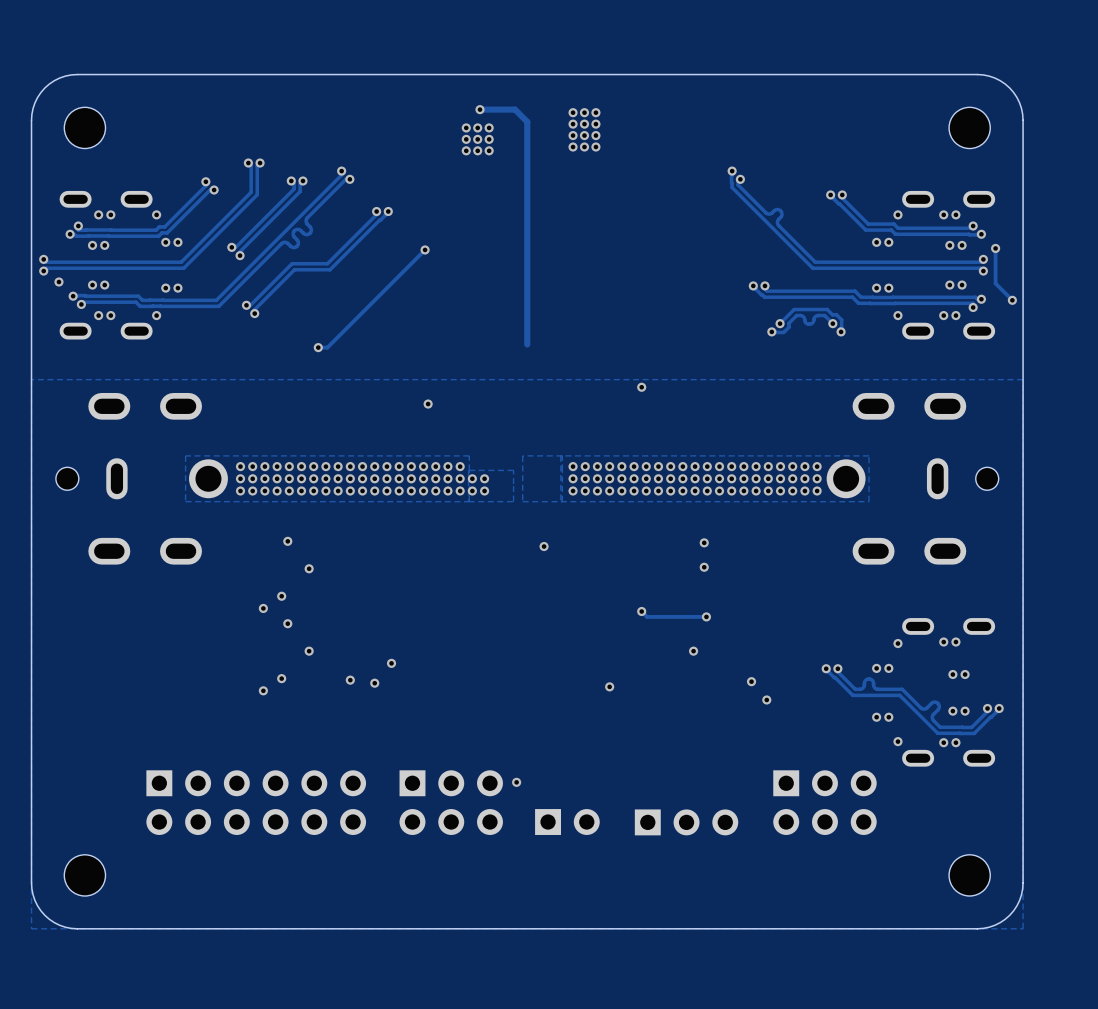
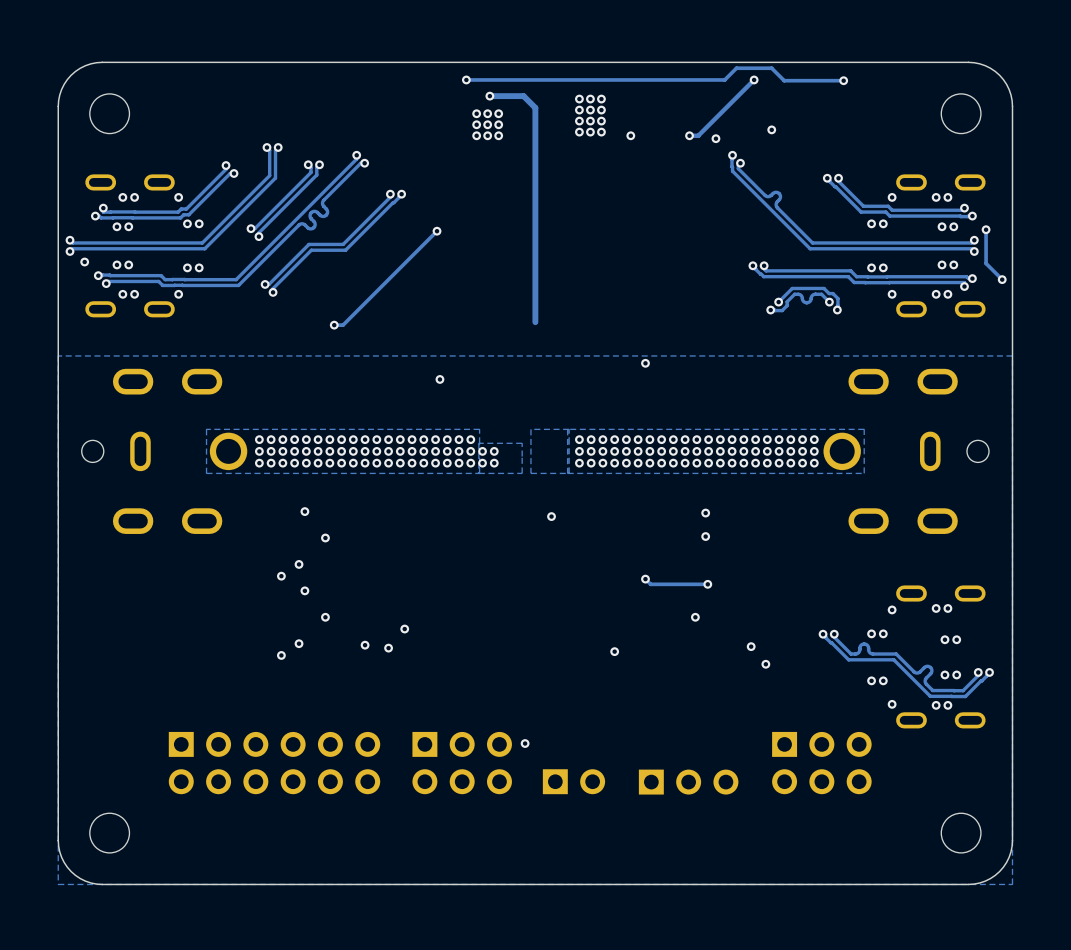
track: none -> (466, 79) (724, 79) (736, 68) (771, 68) (784, 80) (843, 80)
via: none -> (466, 79)
track: none -> (754, 79) (698, 135) (689, 135)
via: none -> (754, 79)
via: none -> (843, 80)
via: none -> (771, 129)
via: none -> (630, 135)
via: none -> (689, 135)
via: none -> (715, 138)

